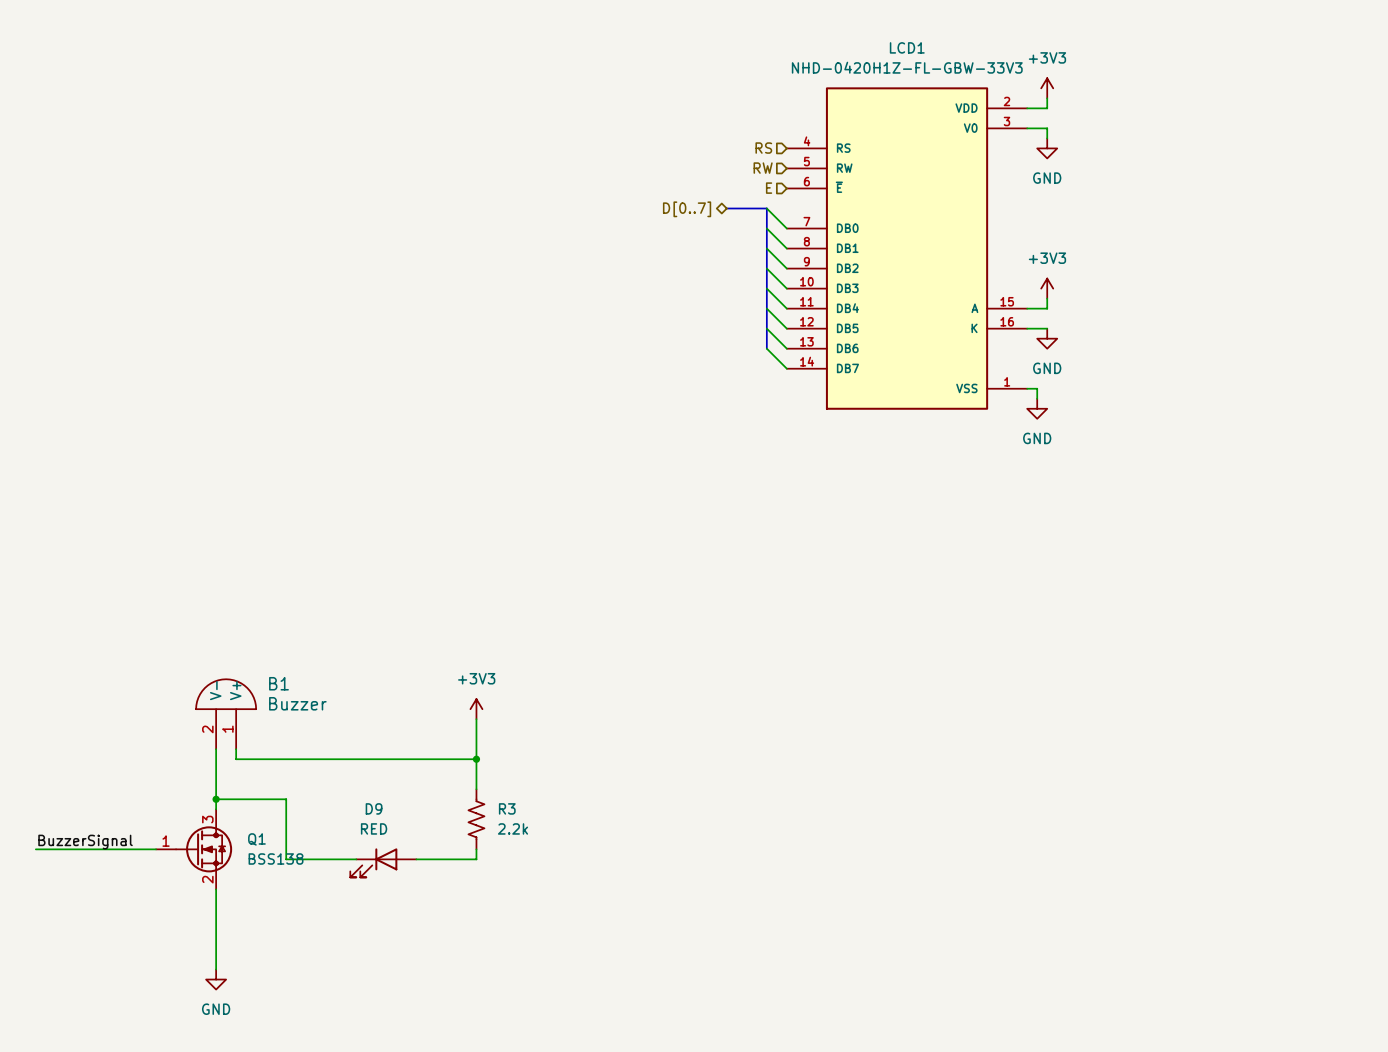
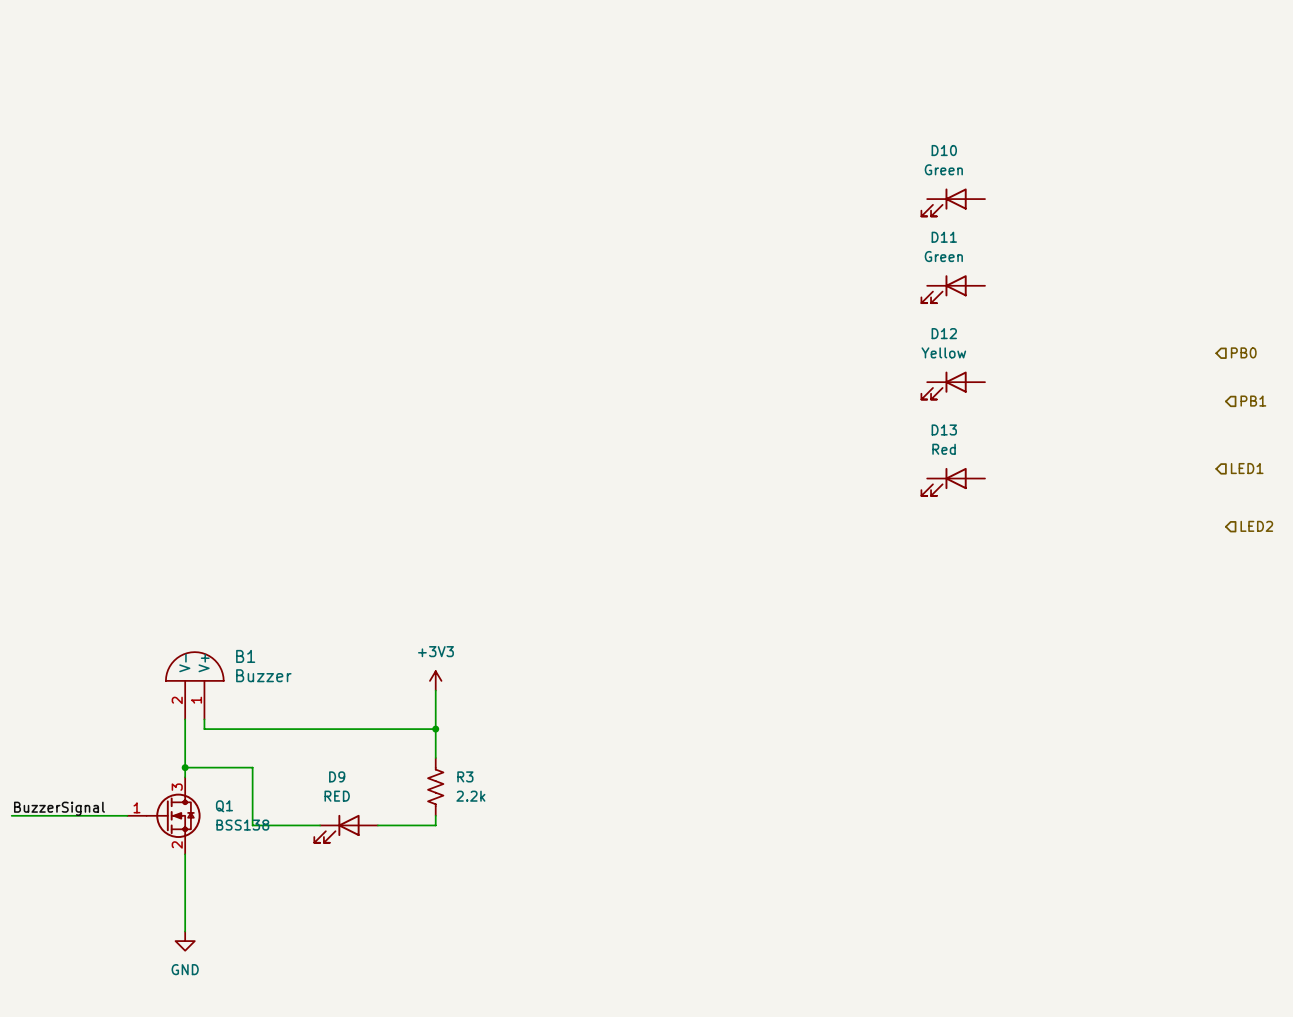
power symbol: +3V3 (1047, 88) -> none
wire: (1047, 98) (1047, 108) (1027, 108) -> none
wire: (1027, 128) (1047, 128) (1047, 138) -> none
hierarchical label: RS (763, 148) -> none
power symbol: GND (1047, 148) -> none
hierarchical label: RW (763, 168) -> none
hierarchical label: E (769, 188) -> none
bus: (726, 208) (766, 208) (766, 348) -> none
wire: (766, 208) (786, 228) -> none
hierarchical label: D[0..7] (687, 209) -> none
D10: none -> Green (953, 202)
wire: (766, 228) (786, 248) -> none
wire: (766, 248) (786, 268) -> none
LCD1: NHD-0420H1Z-FL-GBW-33V3 (907, 248) -> none
wire: (766, 268) (786, 288) -> none
wire: (766, 288) (786, 308) -> none
power symbol: +3V3 (1047, 288) -> none
wire: (1047, 298) (1047, 308) (1027, 308) -> none
D11: none -> Green (953, 289)
wire: (766, 308) (786, 328) -> none
wire: (766, 328) (786, 348) -> none
wire: (1027, 328) (1047, 328) -> none
power symbol: GND (1047, 338) -> none
wire: (766, 348) (786, 368) -> none
hierarchical label: none -> PB0 (1243, 352)
wire: (1027, 388) (1037, 388) (1037, 398) -> none
D12: none -> Yellow (953, 385)
power symbol: GND (1037, 408) -> none
hierarchical label: none -> PB1 (1253, 401)
hierarchical label: none -> LED1 (1247, 468)
D13: none -> Red (953, 481)
hierarchical label: none -> LED2 (1256, 526)

